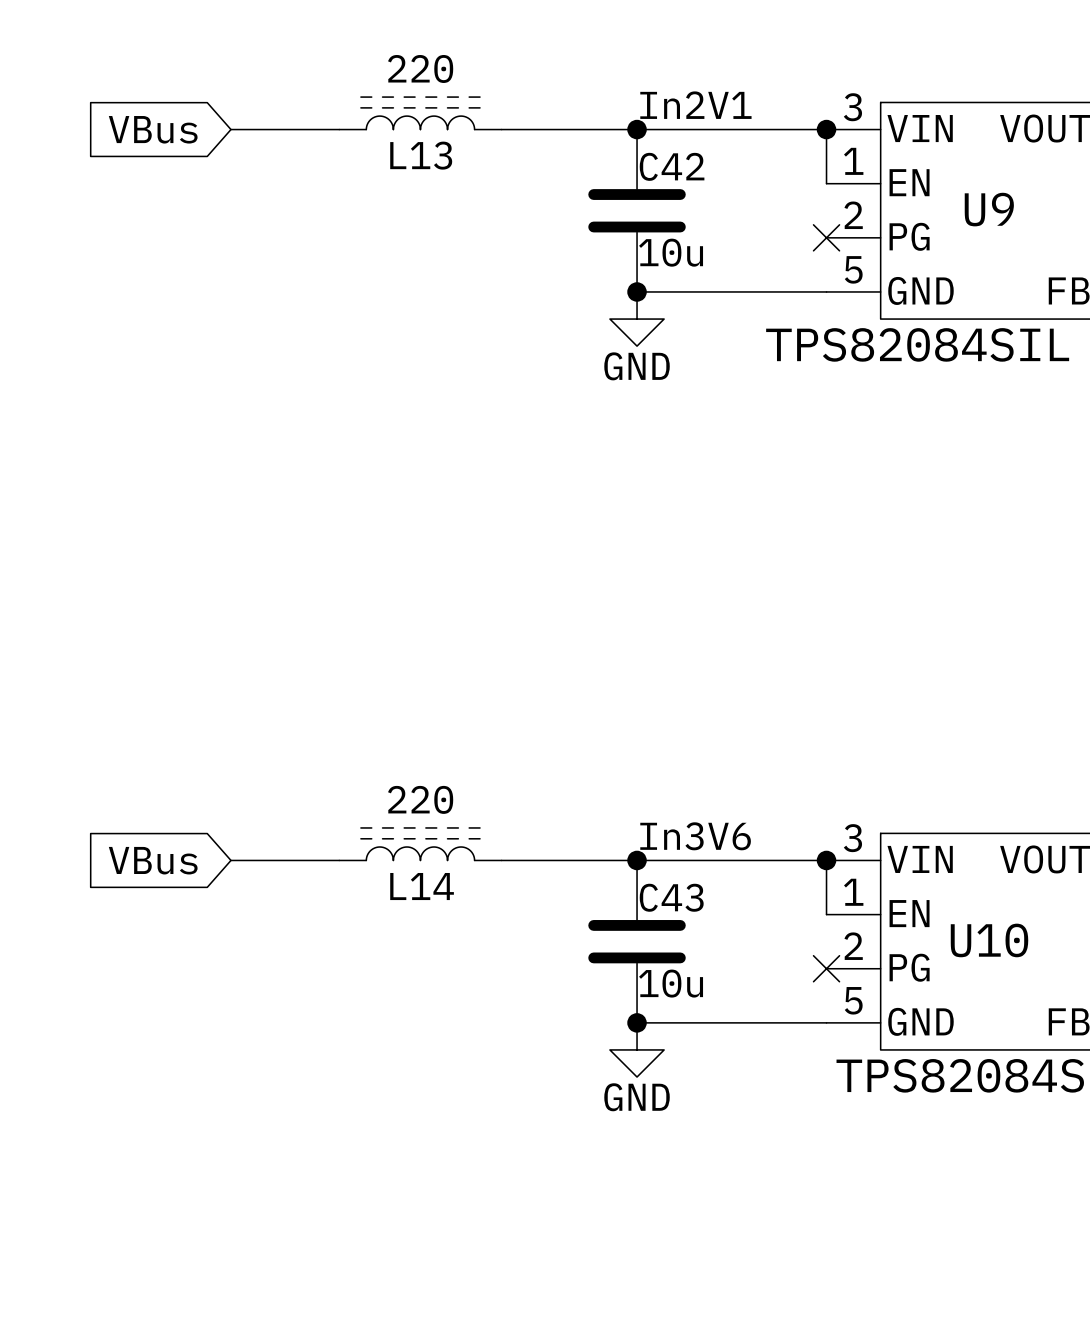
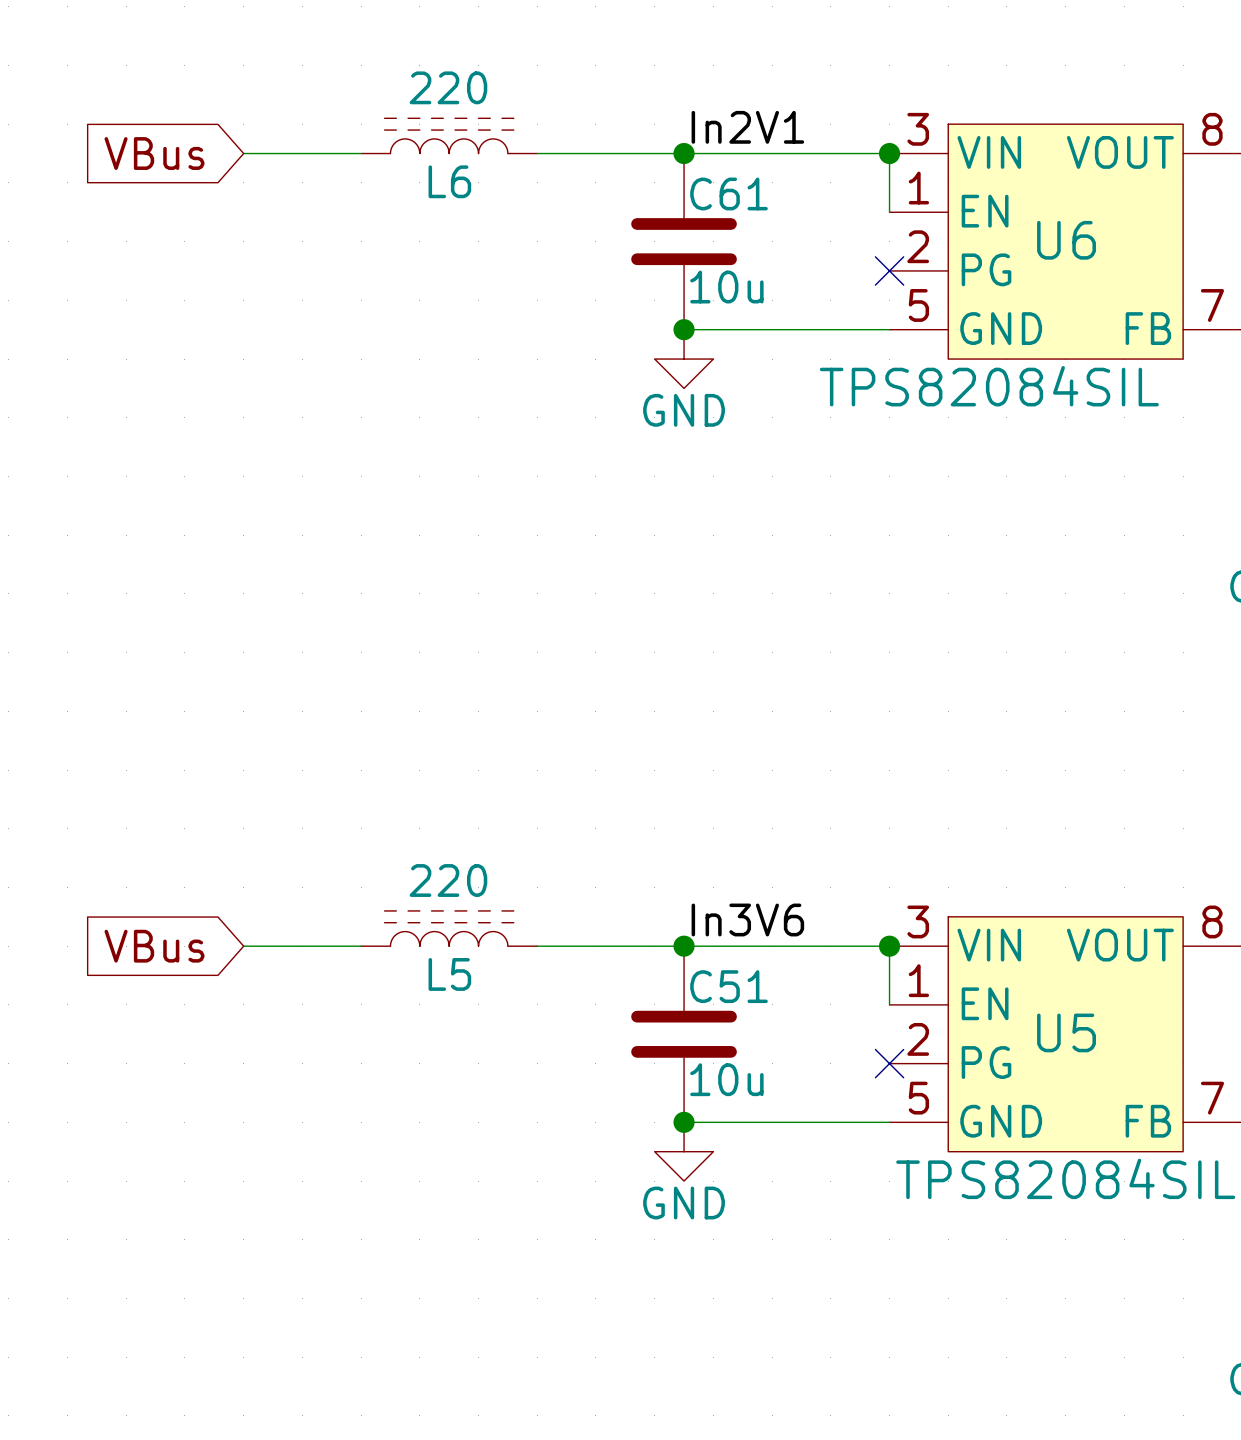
L13 name: L13 (421, 155) -> L6 (449, 181)
C42 name: C42 (672, 166) -> C61 (728, 193)
U9 name: U9 (989, 209) -> U6 (1066, 240)
L14 name: L14 (422, 886) -> L5 (449, 974)
C43 name: C43 (671, 897) -> C51 (728, 986)
U10 name: U10 (989, 940) -> U5 (1066, 1032)

